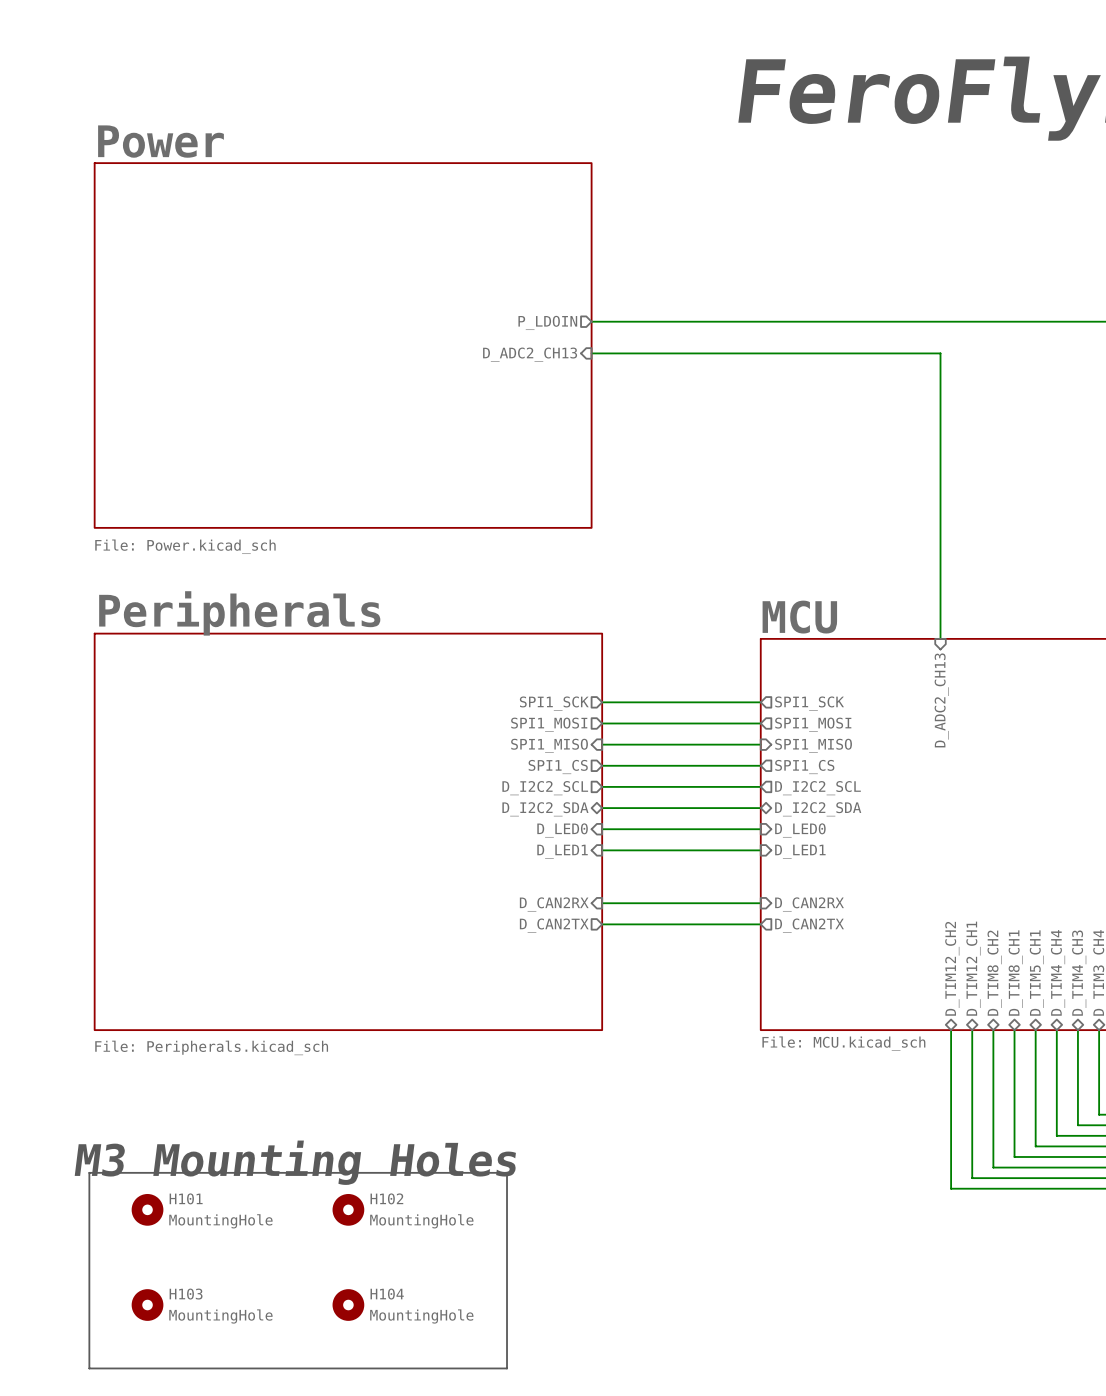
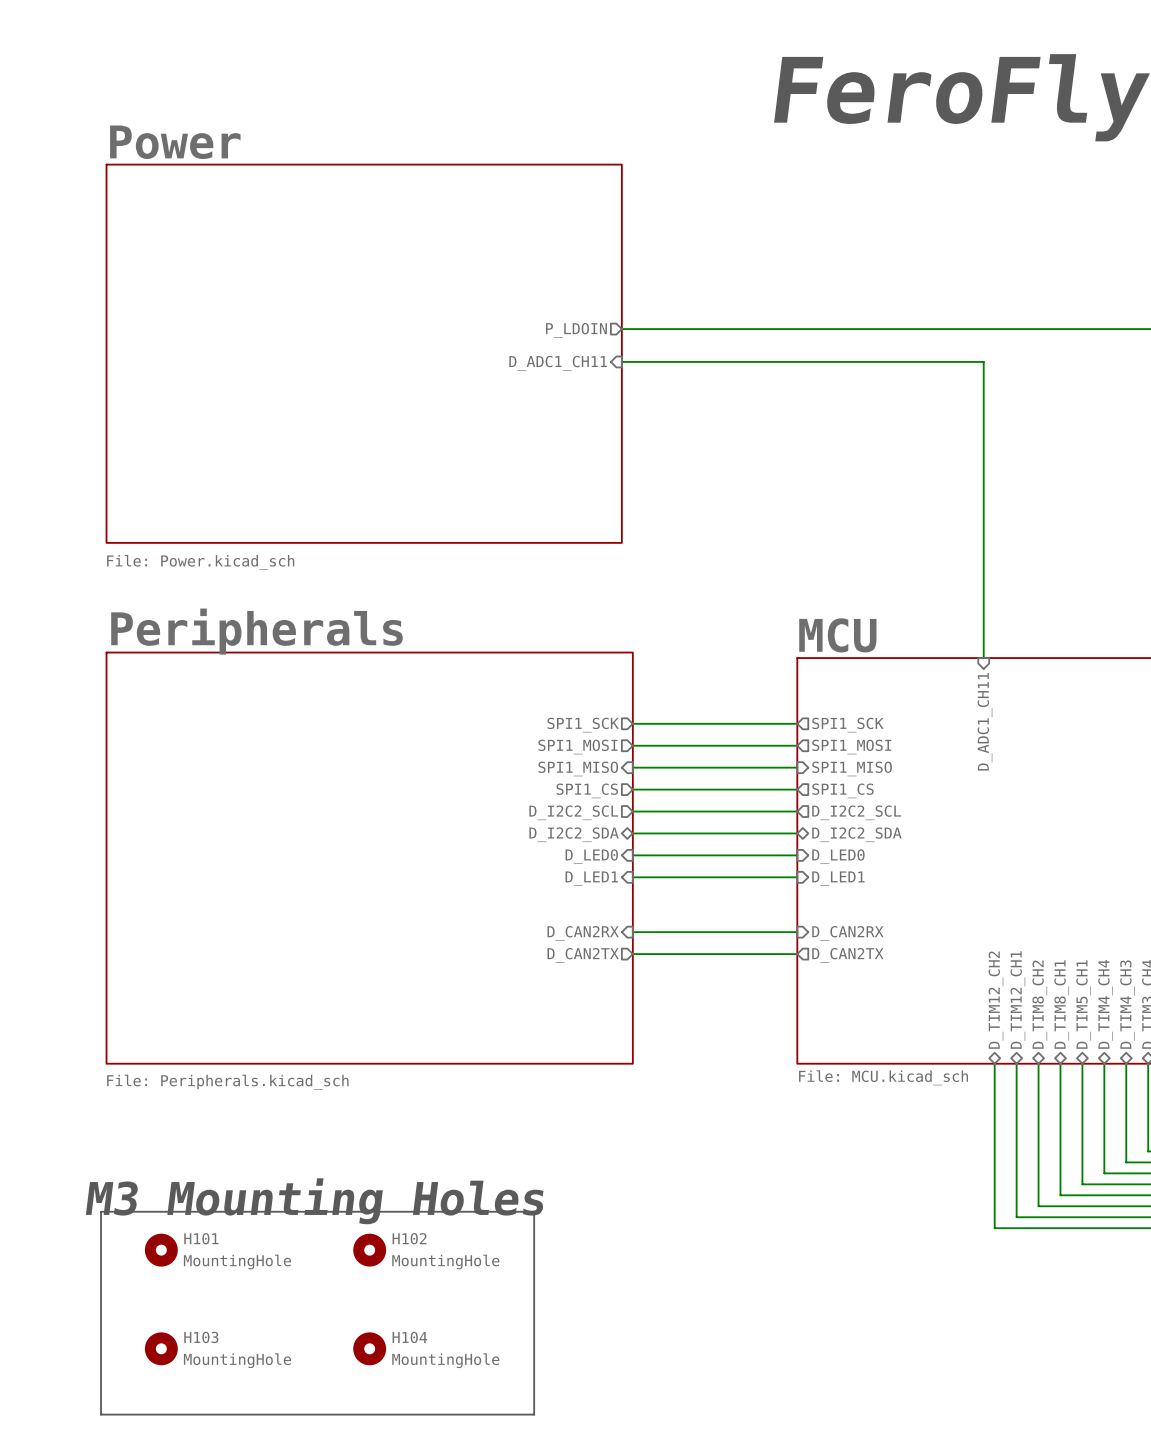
sheet pin: D_ADC2_CH13 (530, 354) -> D_ADC1_CH11 (558, 363)
sheet pin: D_ADC2_CH13 (941, 700) -> D_ADC1_CH11 (984, 721)

